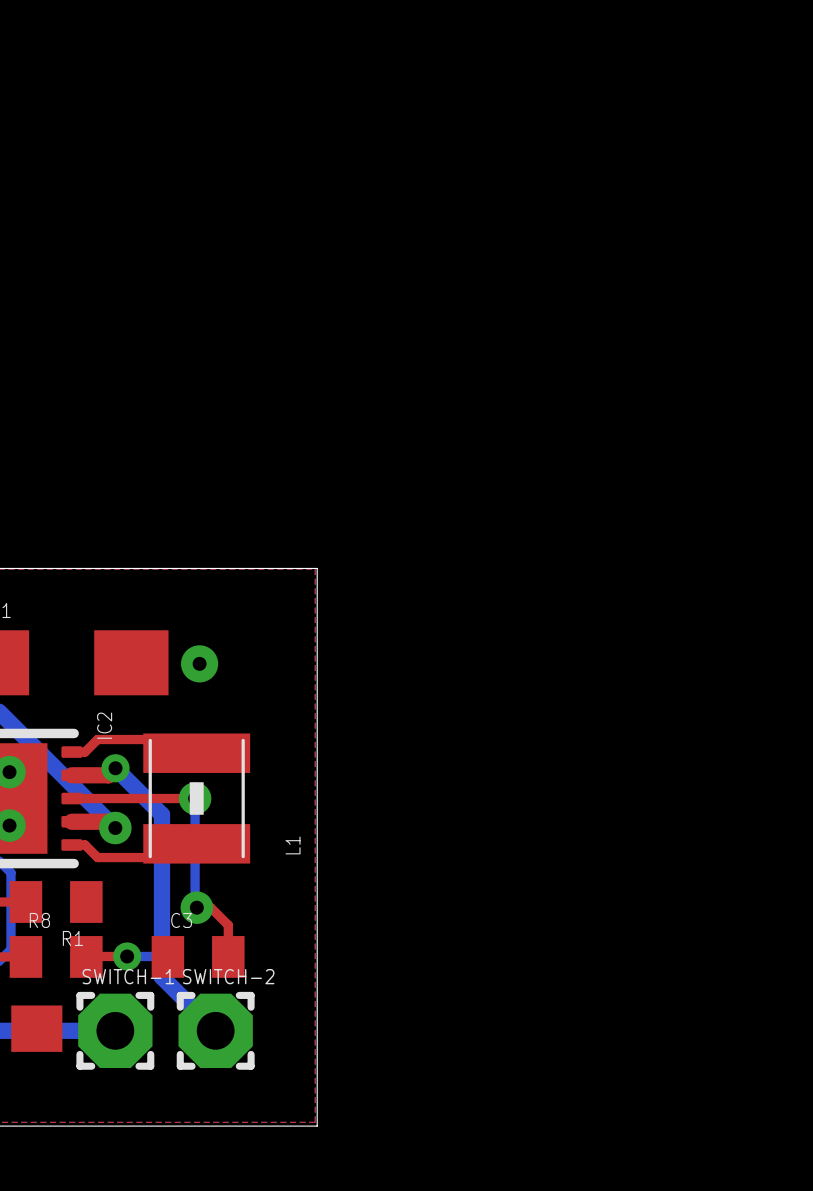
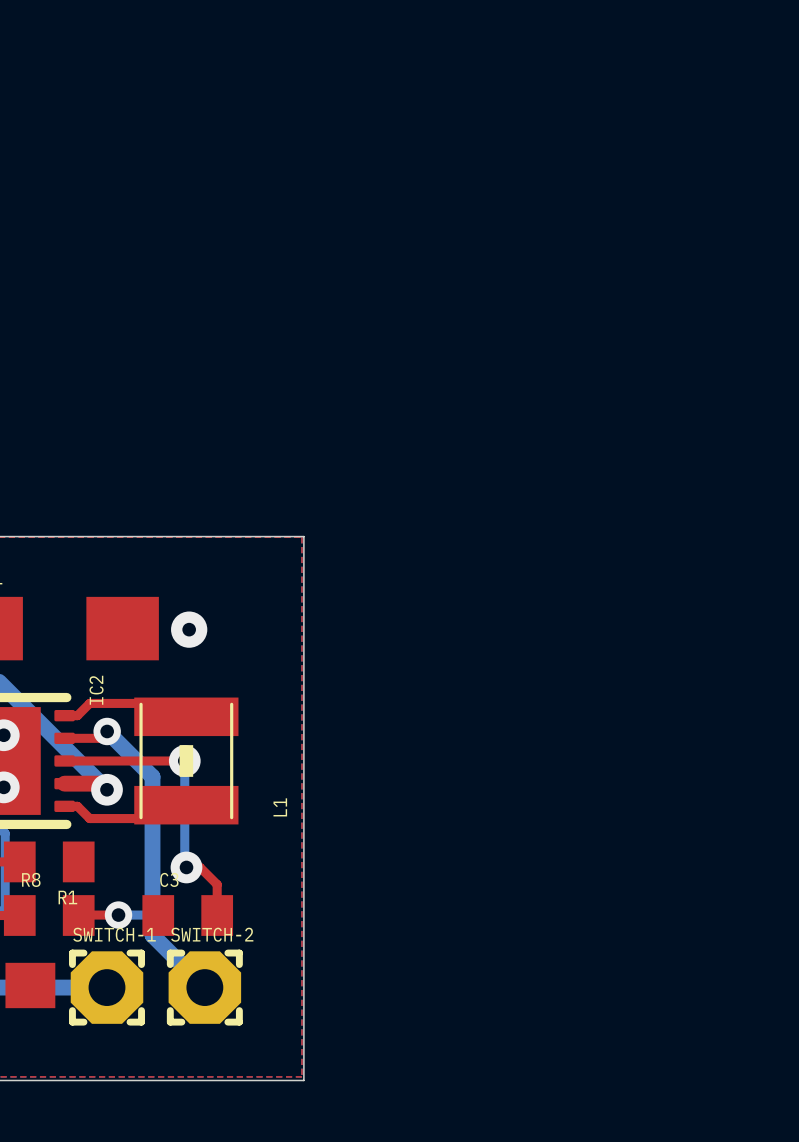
top track width: thick (115, 768) (108, 775) (71, 775) -> thin (107, 731) (100, 738) (64, 738)

